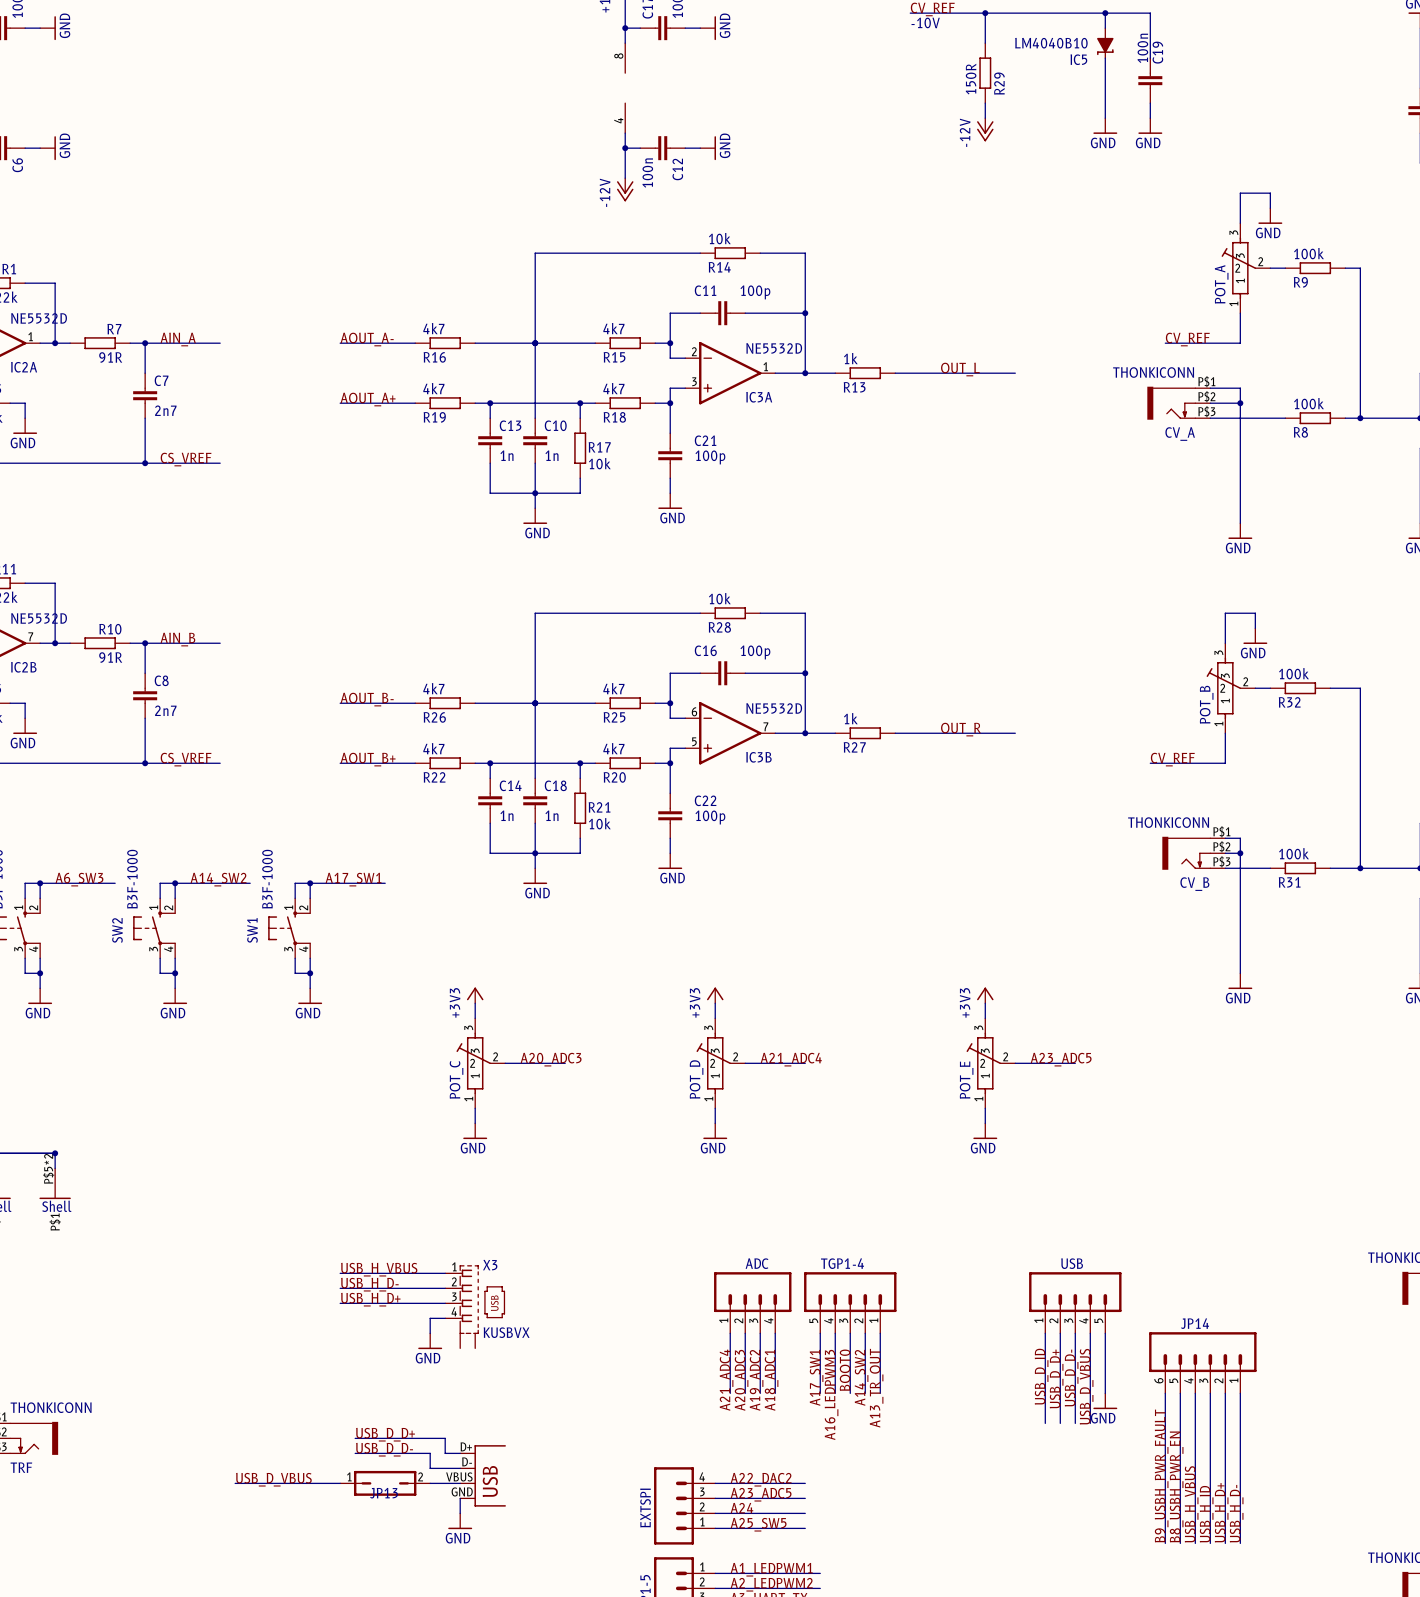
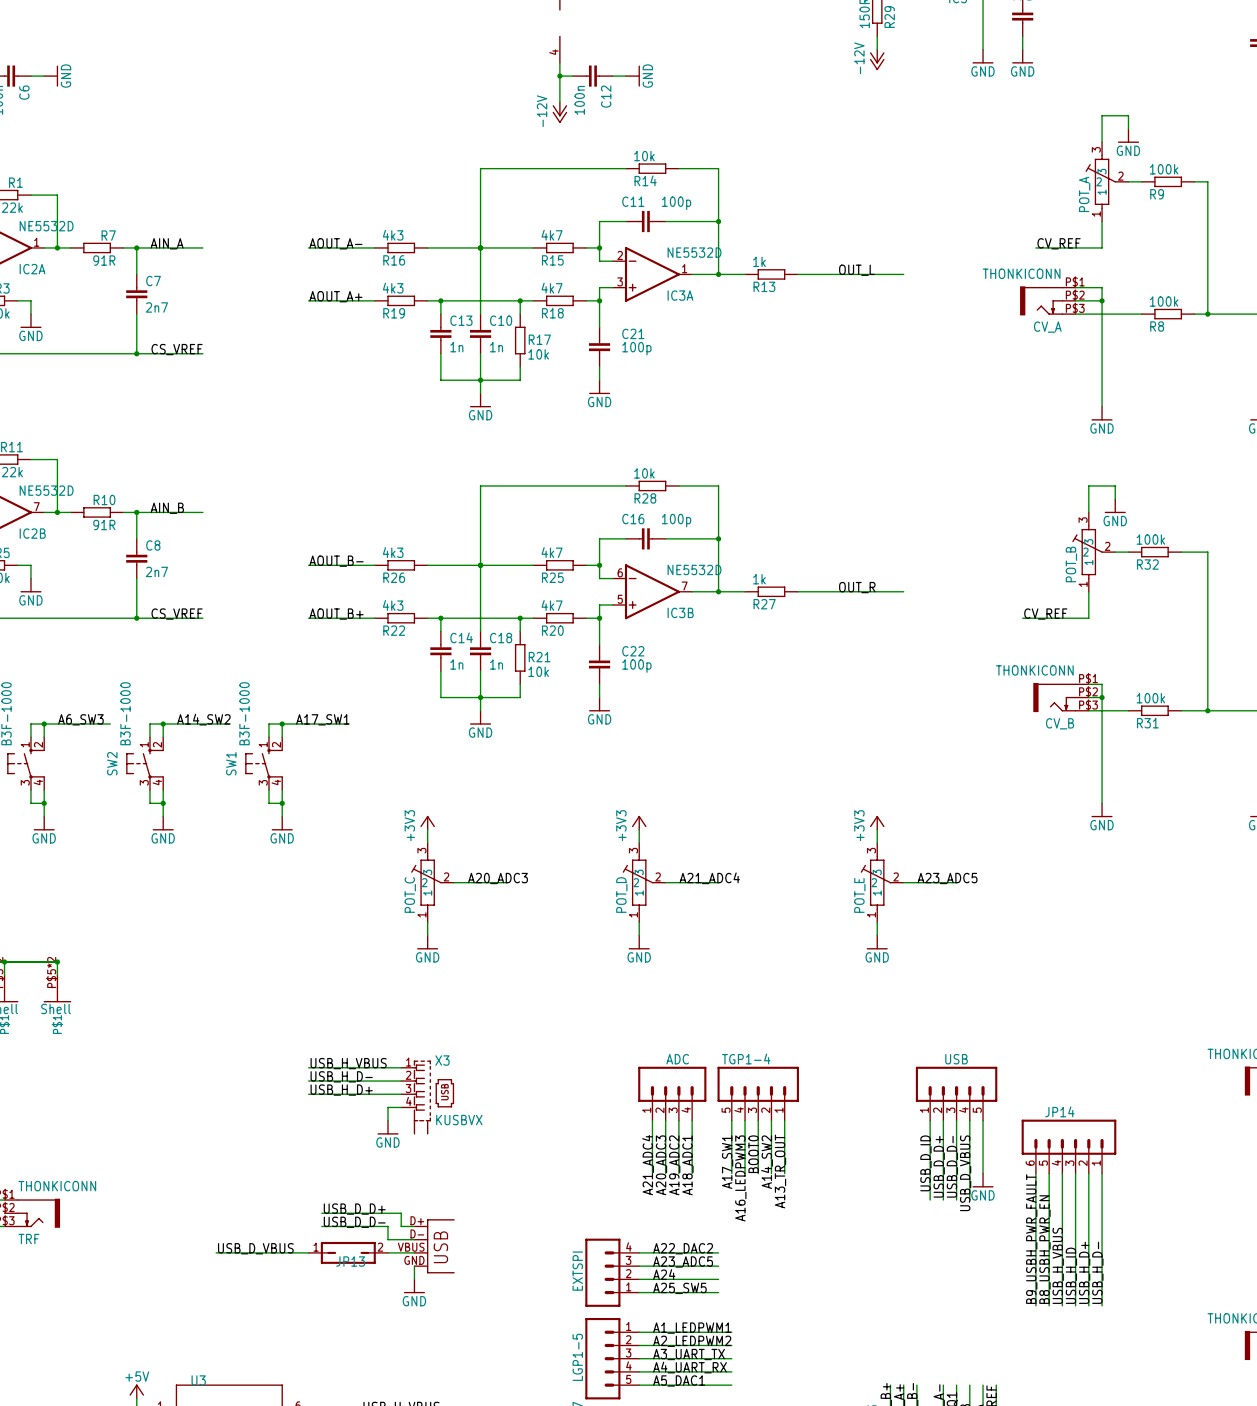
R16 value: 4k7 (433, 328) -> 4k3 (393, 235)
R19 value: 4k7 (433, 388) -> 4k3 (393, 288)
R26 value: 4k7 (433, 688) -> 4k3 (393, 552)
R22 value: 4k7 (433, 748) -> 4k3 (393, 605)

